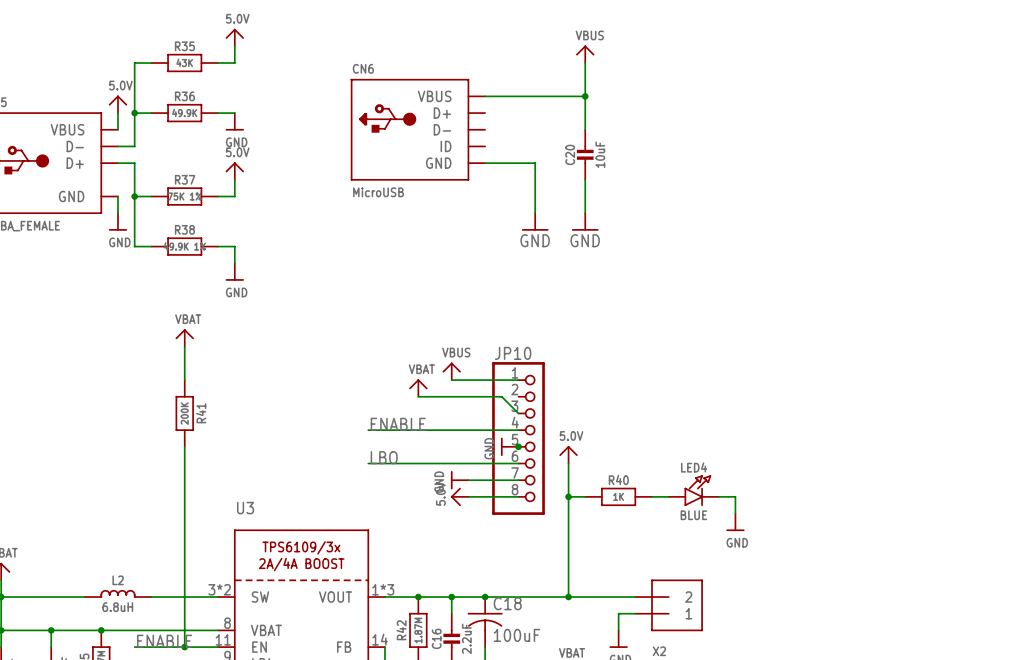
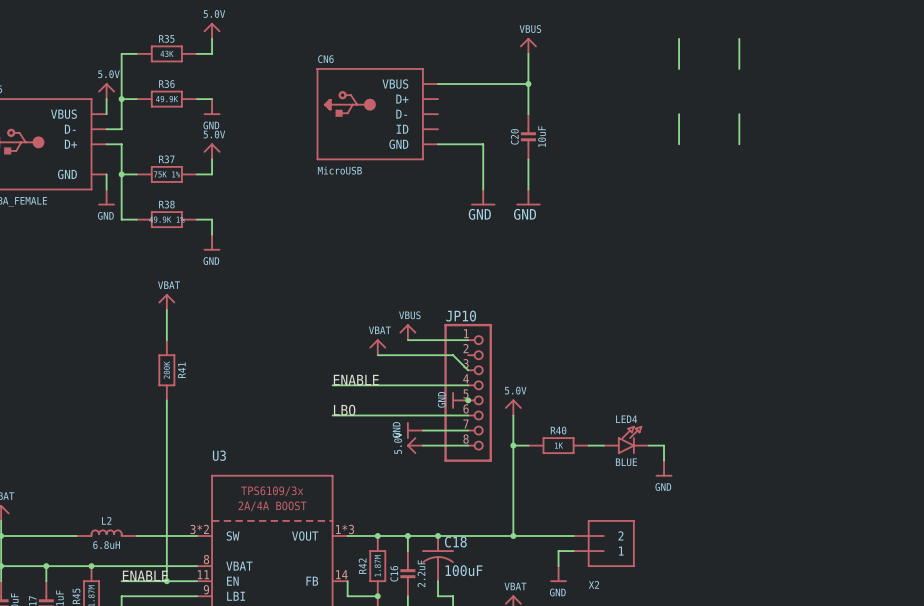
wire: none -> (679, 38) (679, 68)
wire: none -> (739, 38) (739, 68)
wire: none -> (679, 114) (679, 144)
wire: none -> (739, 114) (739, 144)

